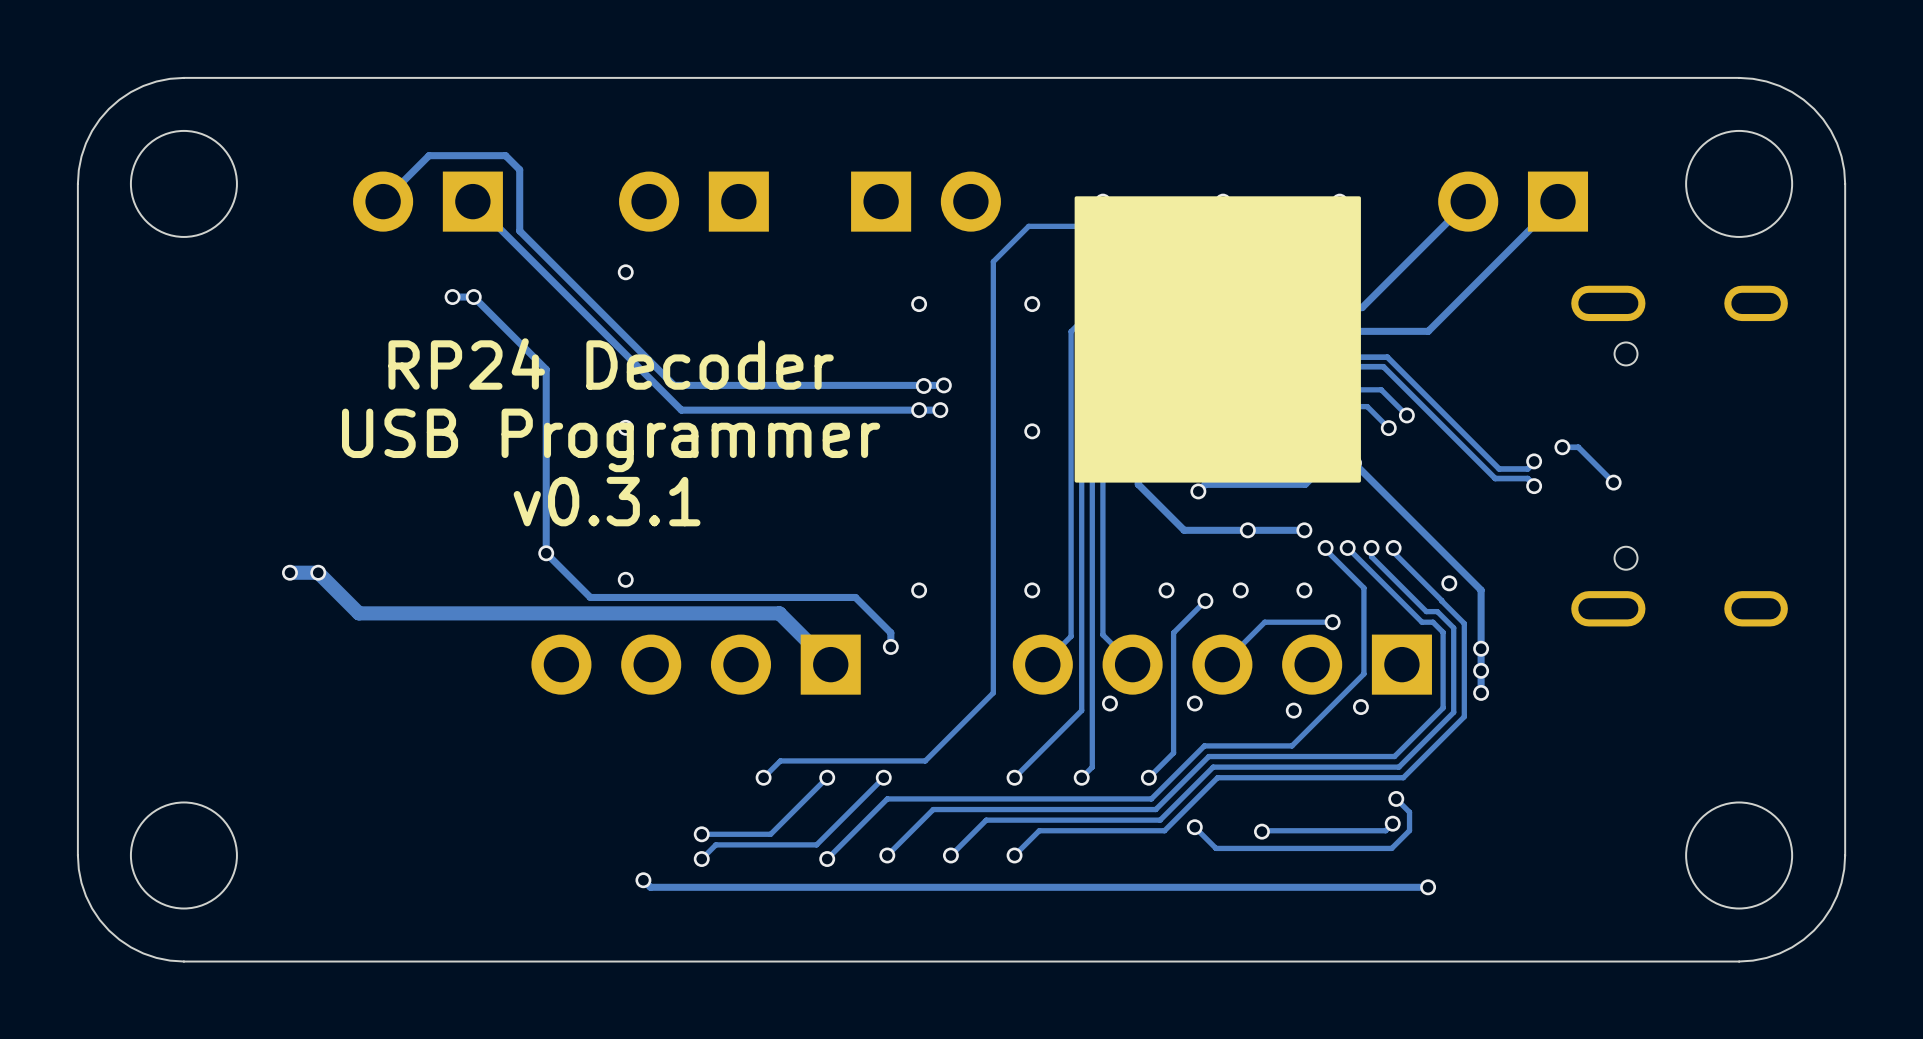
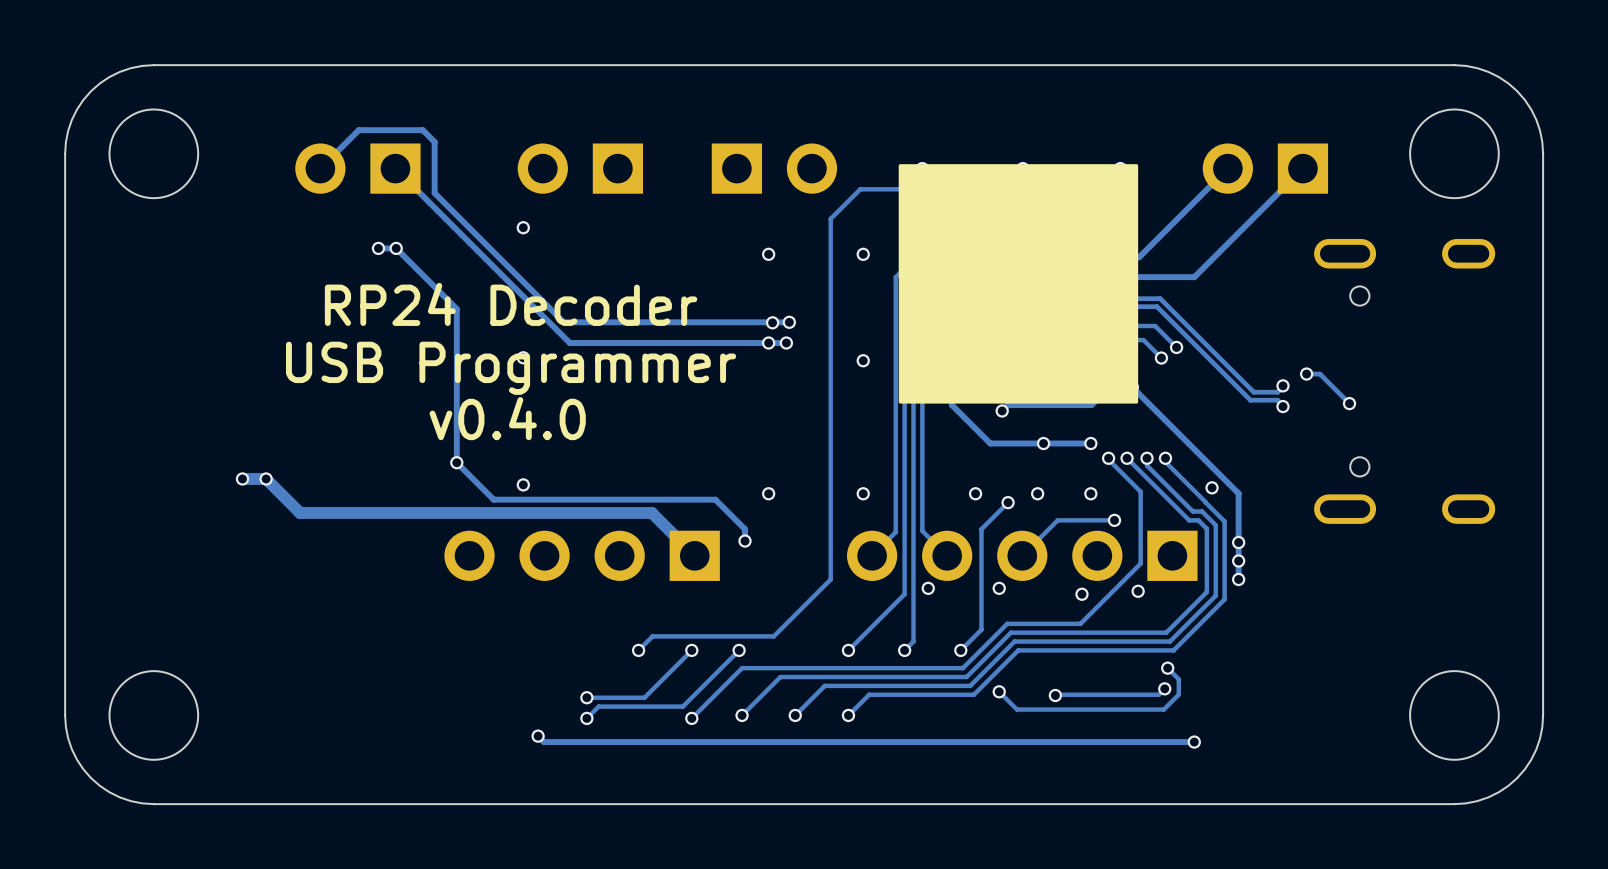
text: v0.3.1 (607, 501) -> v0.4.0 (507, 418)

